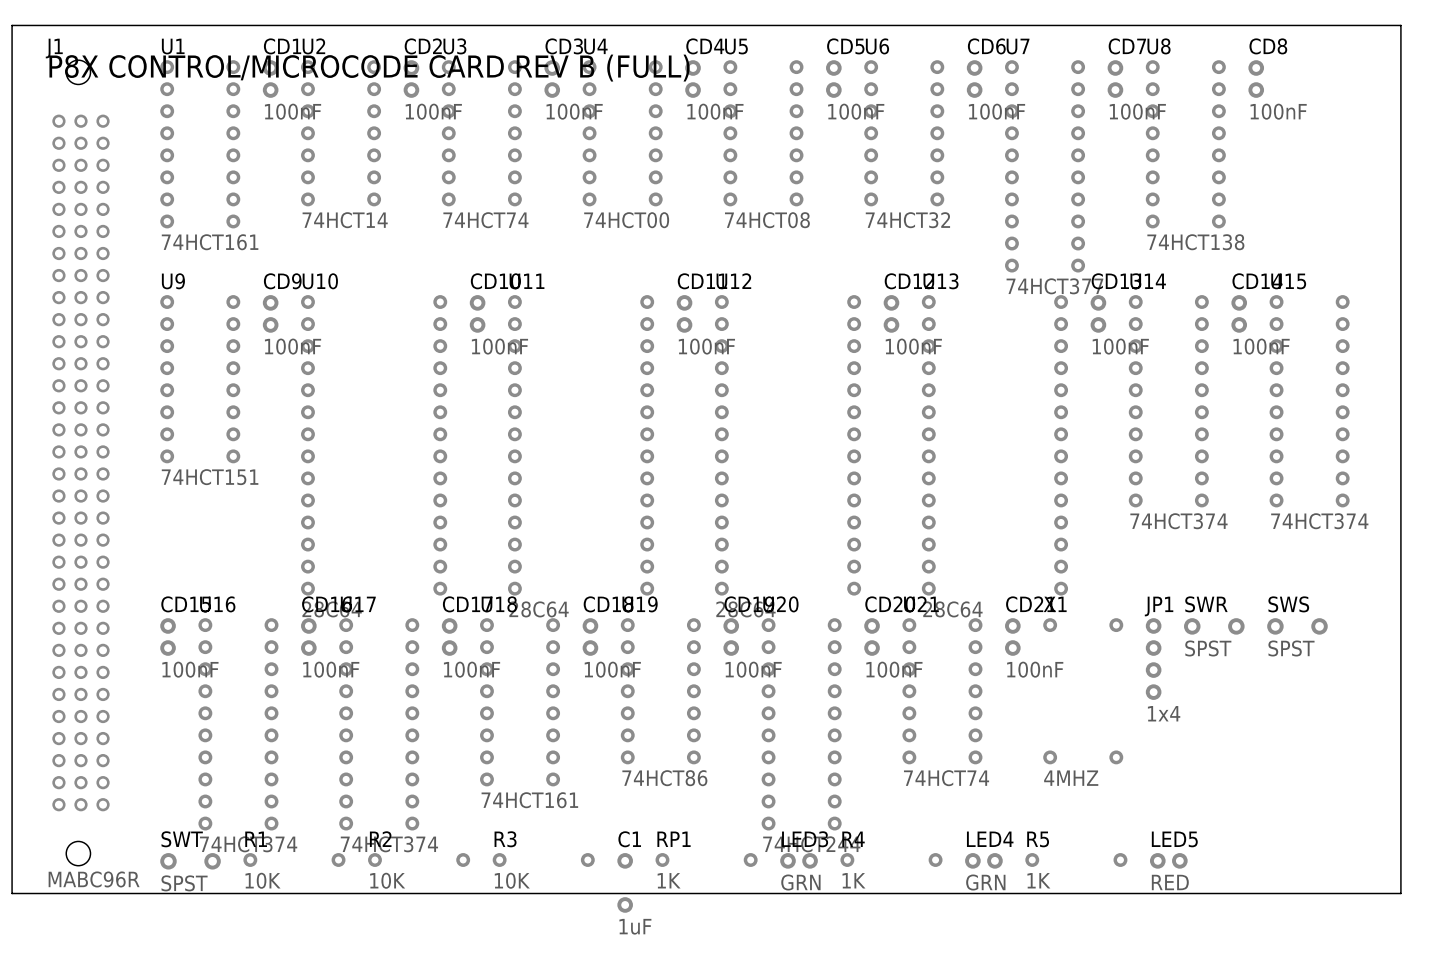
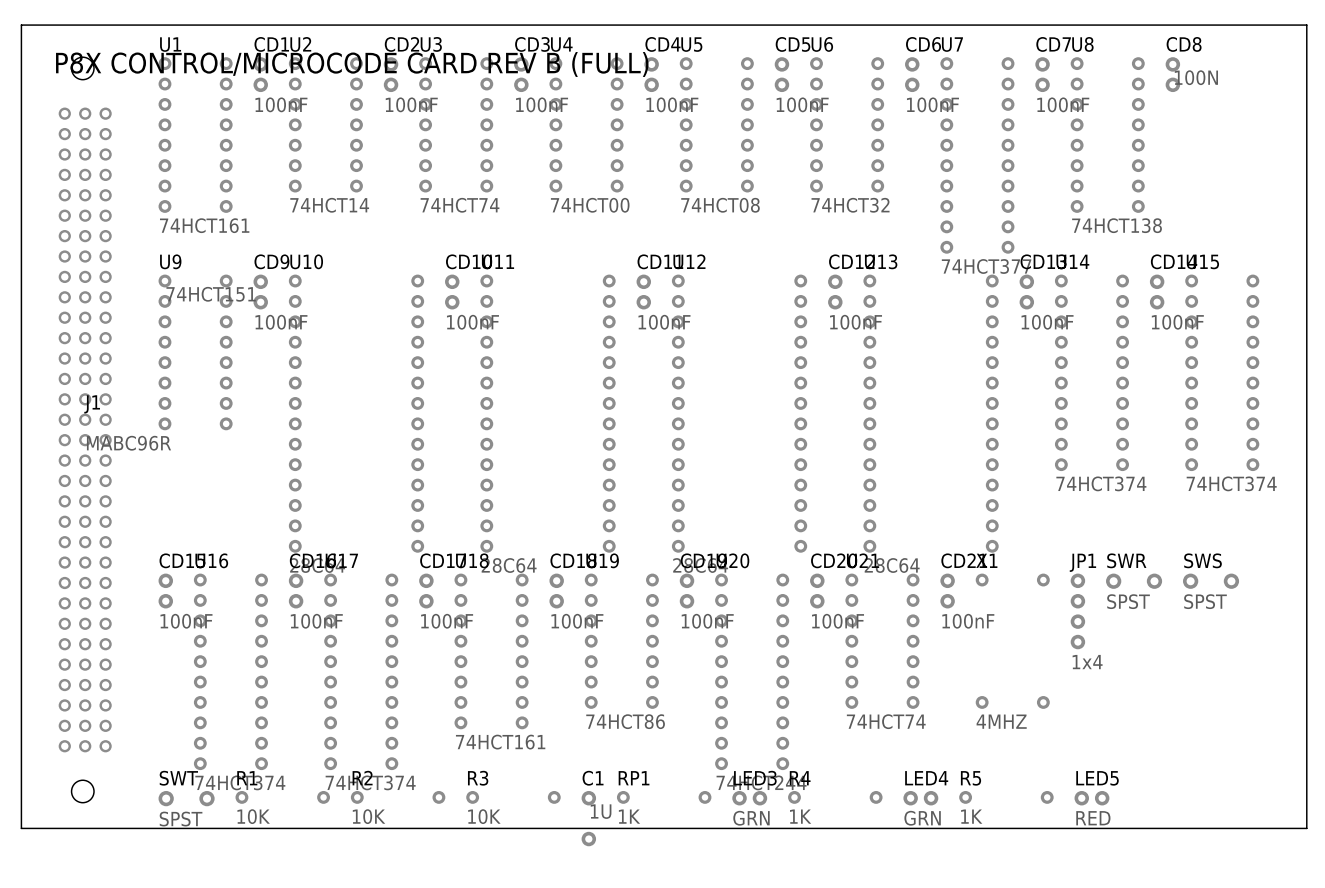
J1 name position: J1 (54, 48) -> J1 (92, 404)
CD8 value: 100nF (1278, 111) -> 100N (1196, 77)
U9 value position: 74HCT151 (210, 477) -> 74HCT151 (211, 294)
J1 value position: MABC96R (94, 879) -> MABC96R (129, 443)
C1 value: 1uF (635, 926) -> 1U (601, 811)

